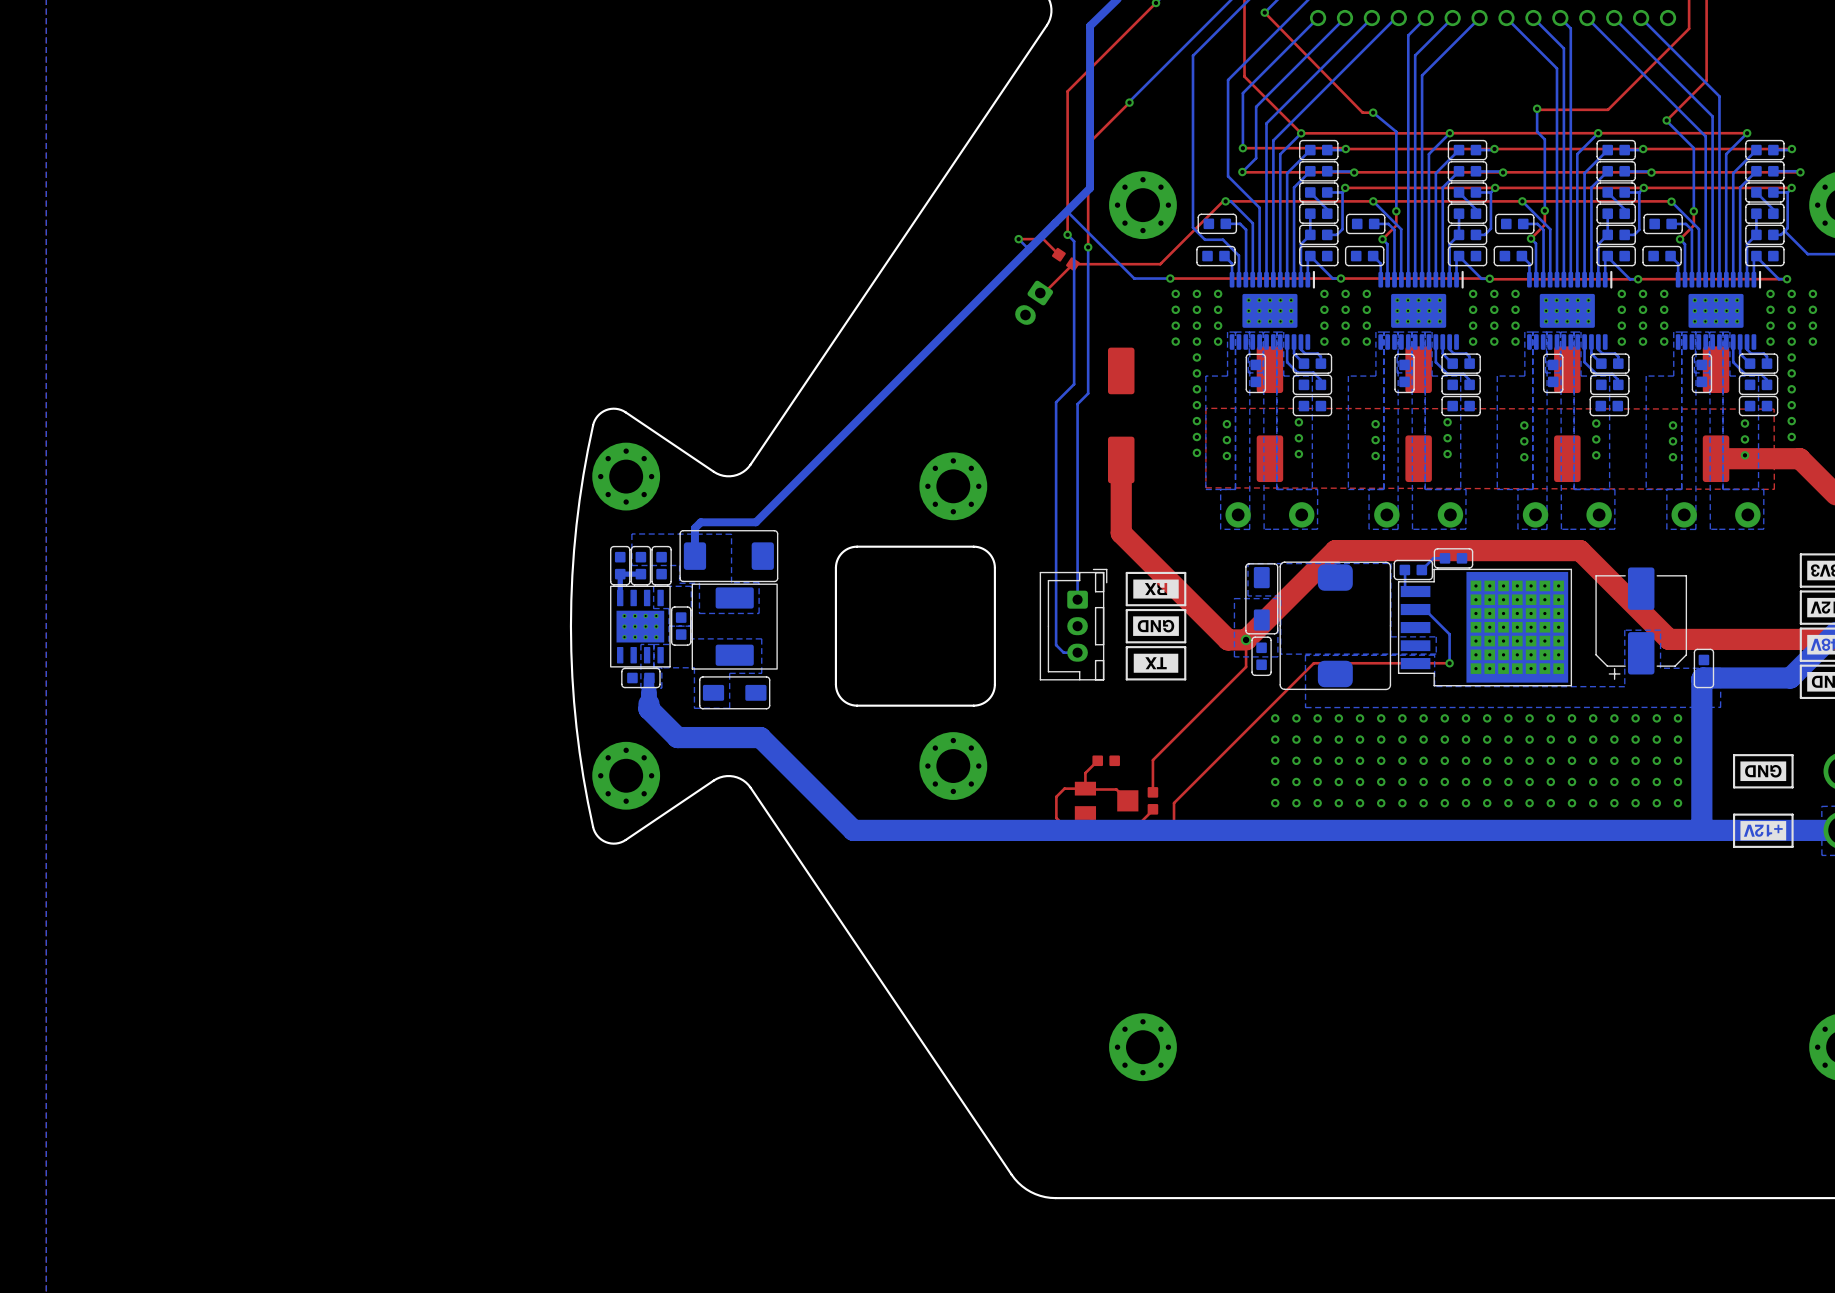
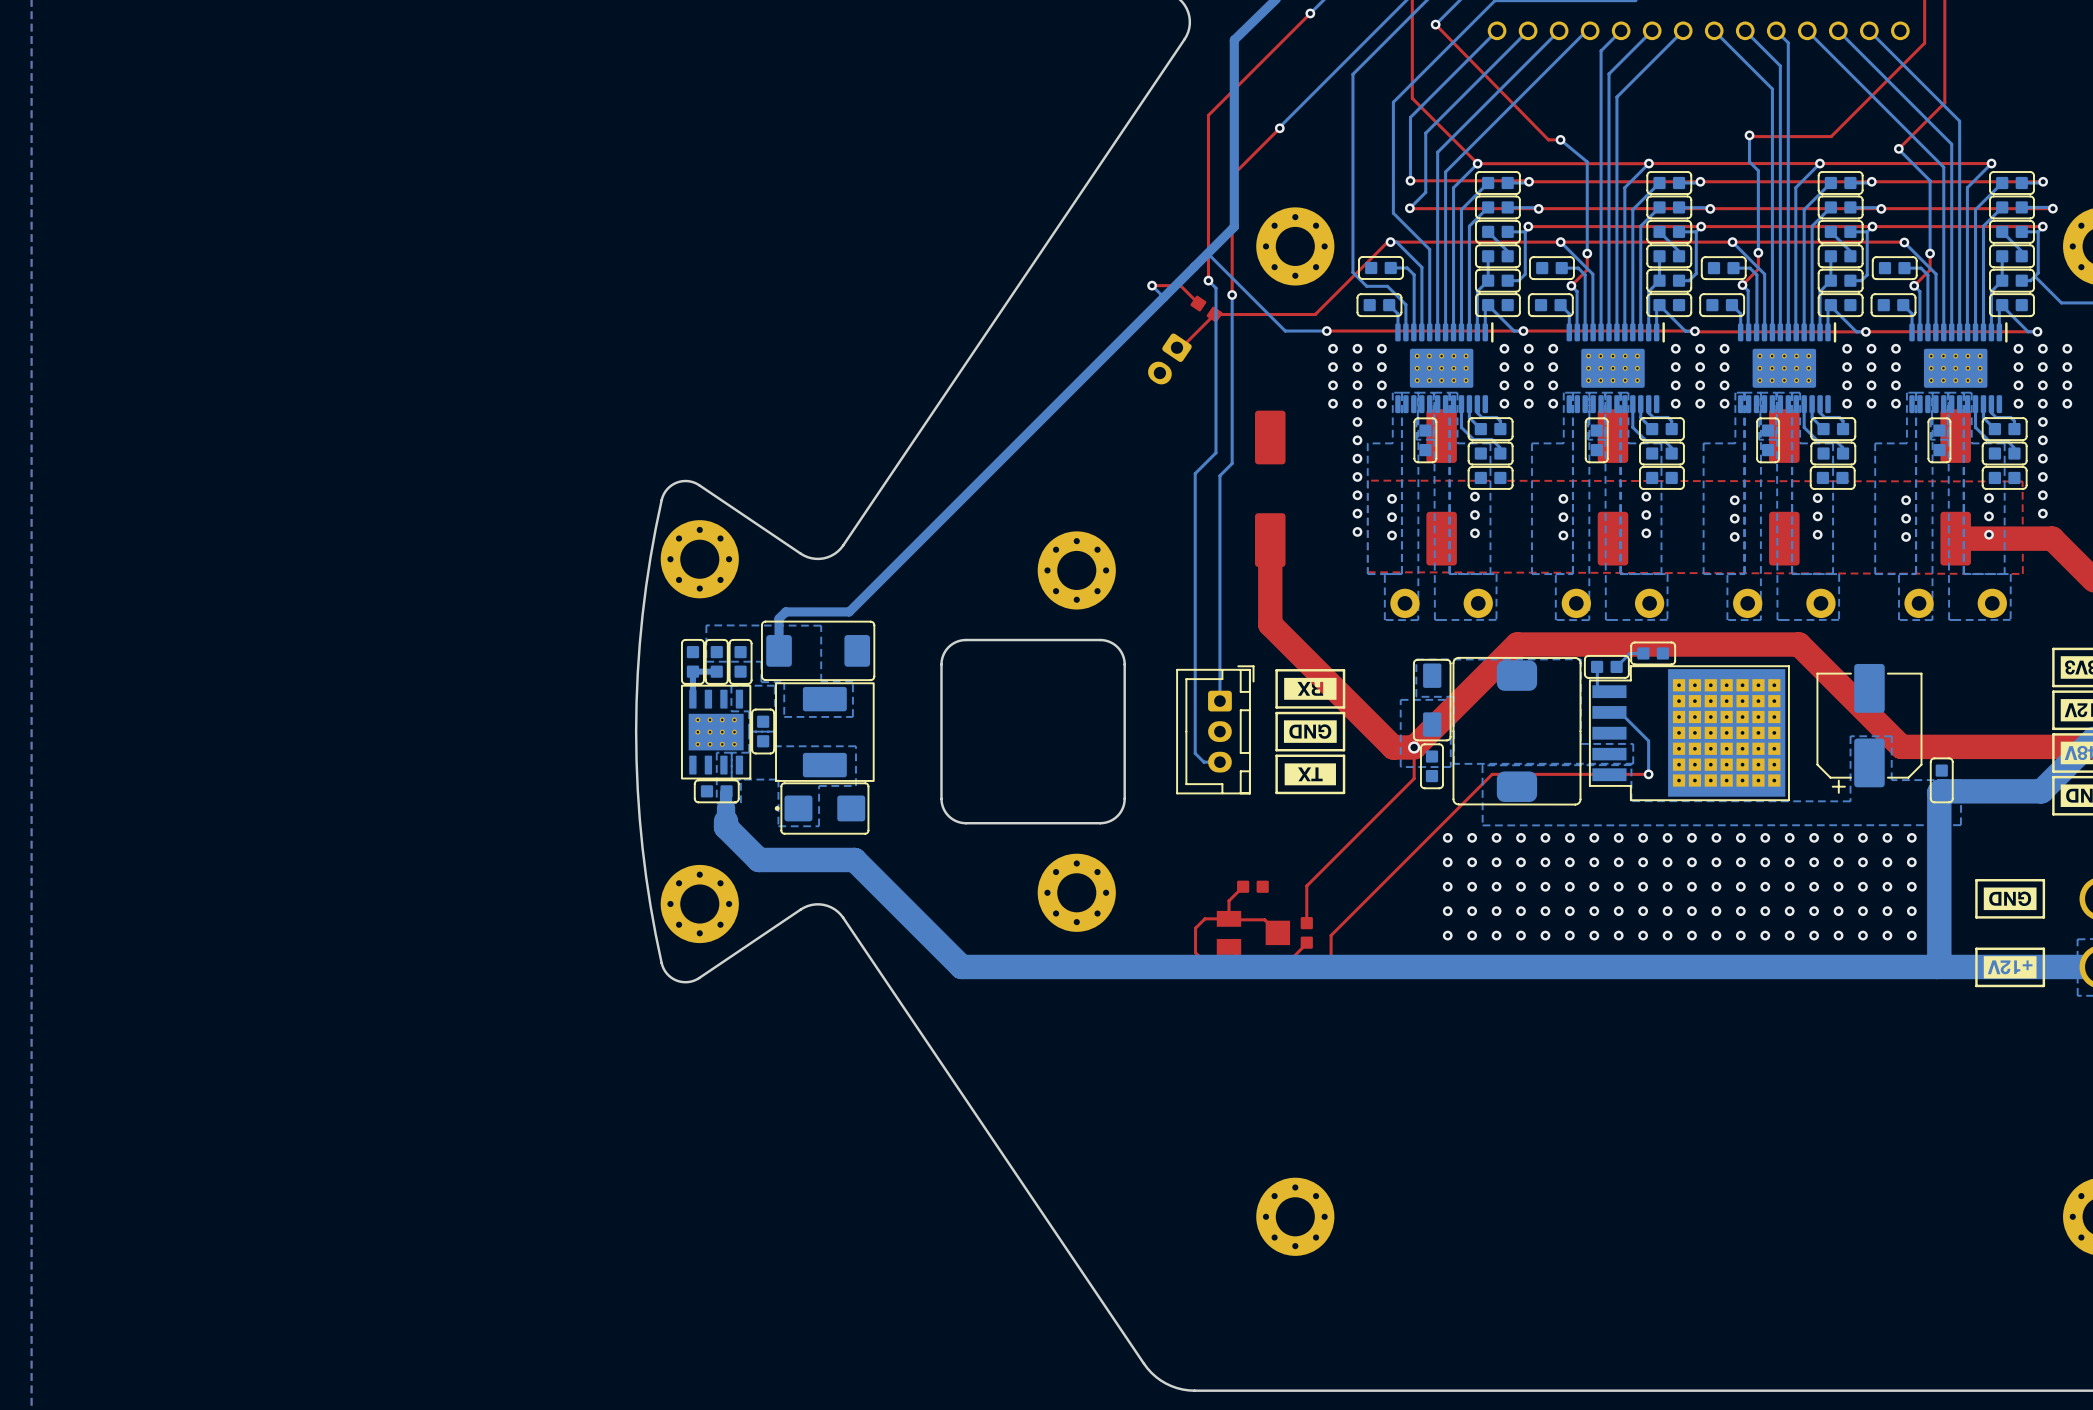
part footprint: [699, 676, 771, 710] -> [774, 782, 870, 835]

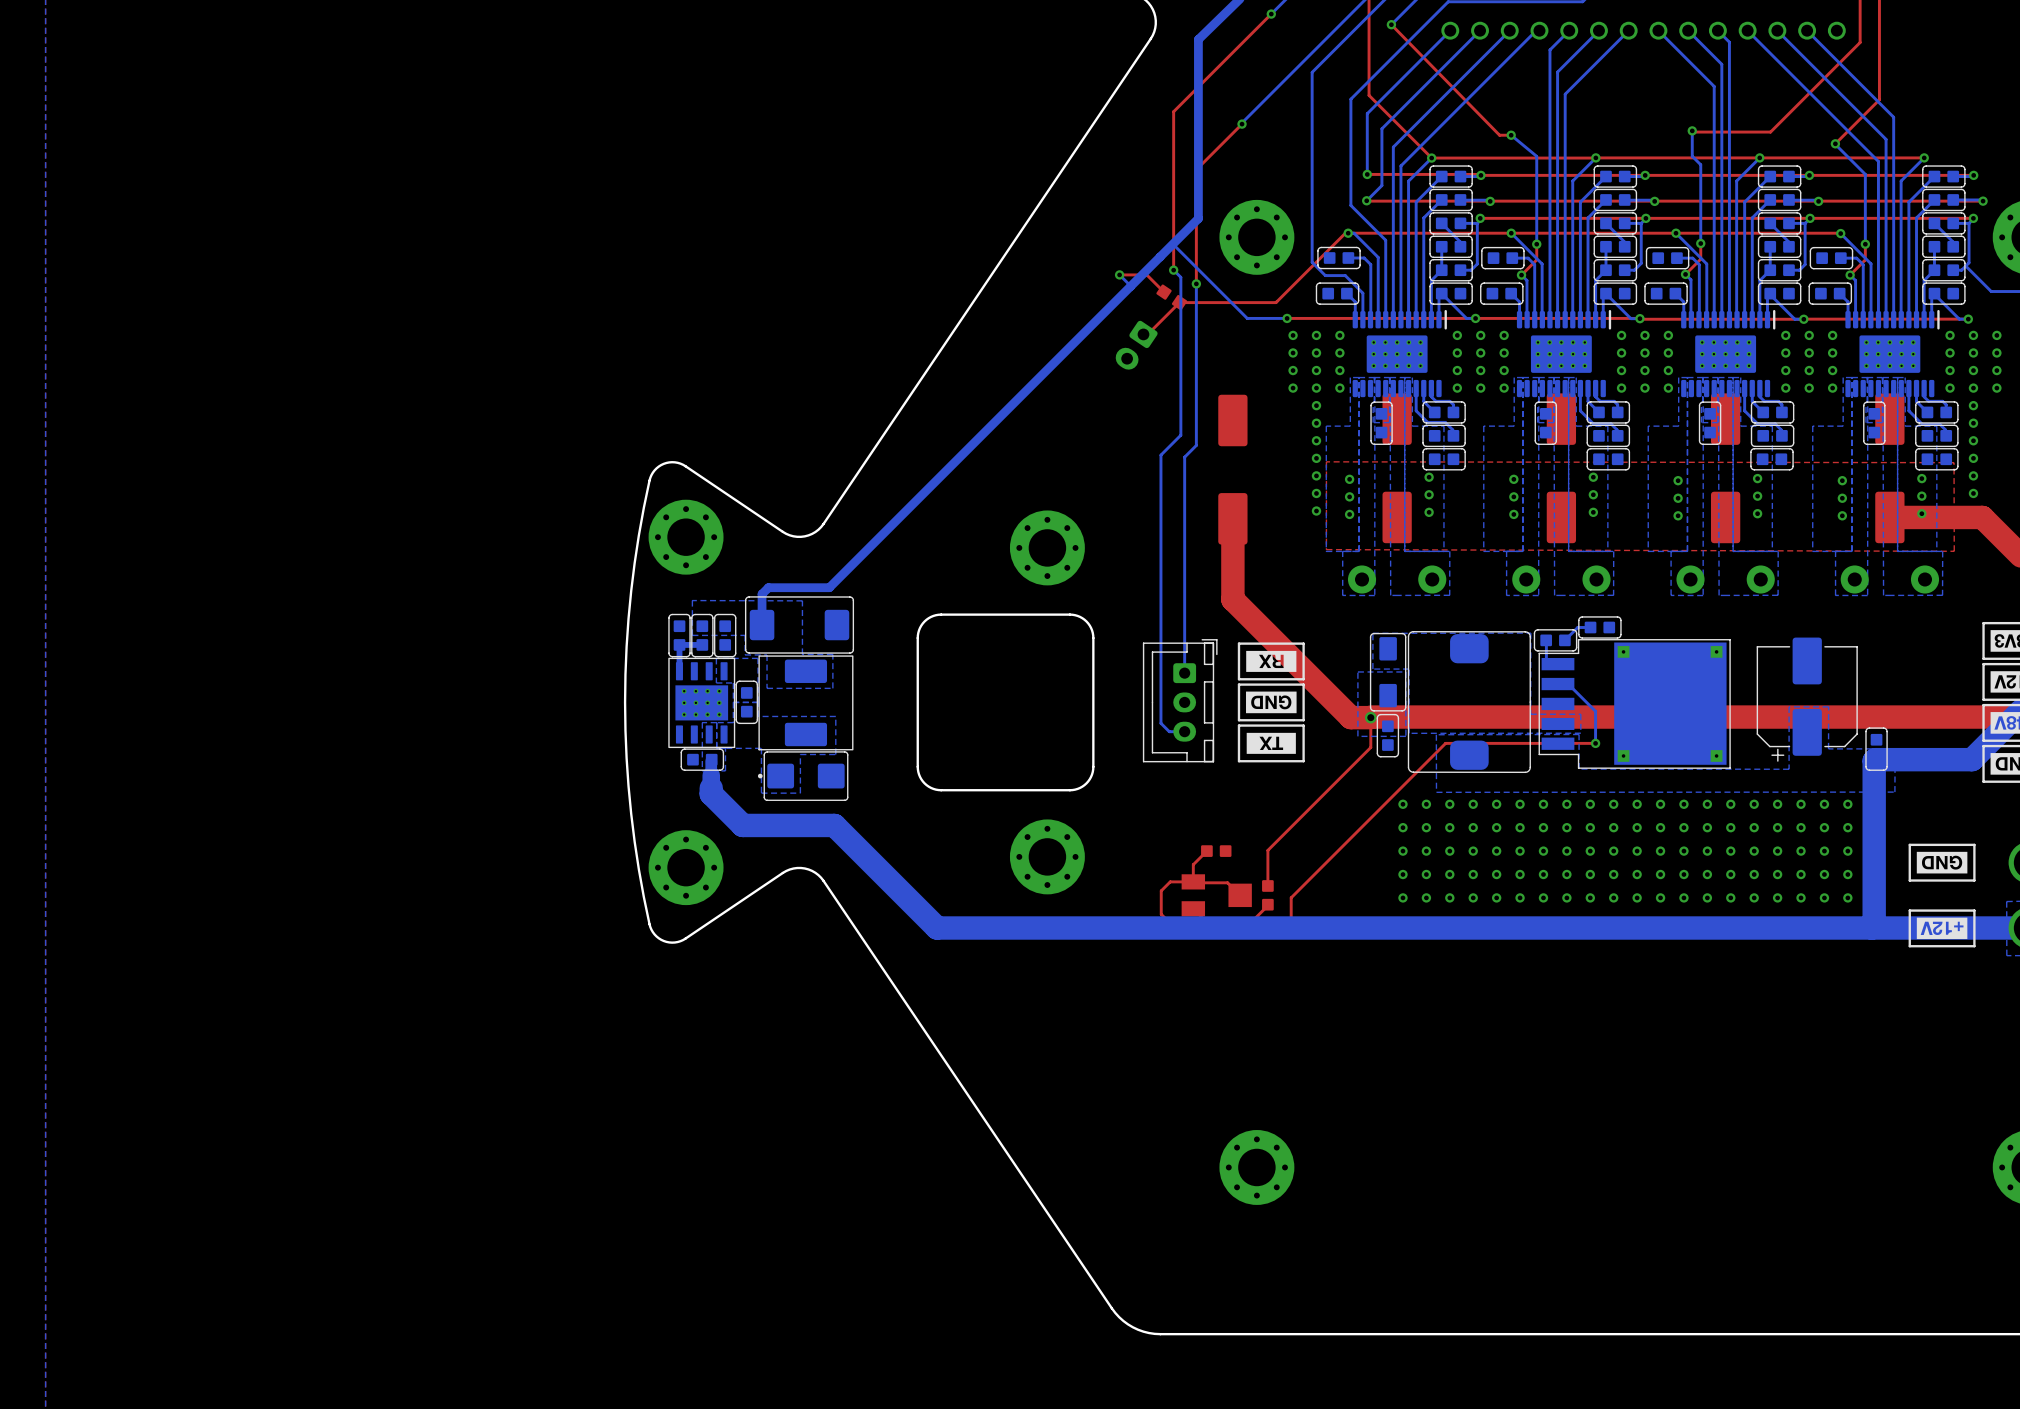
part footprint: [1589, 665, 1790, 801] -> [1538, 639, 1731, 769]
top track: (1901, 746) (1799, 644) (1517, 644) (1414, 746) -> (1837, 717) (1371, 717)

